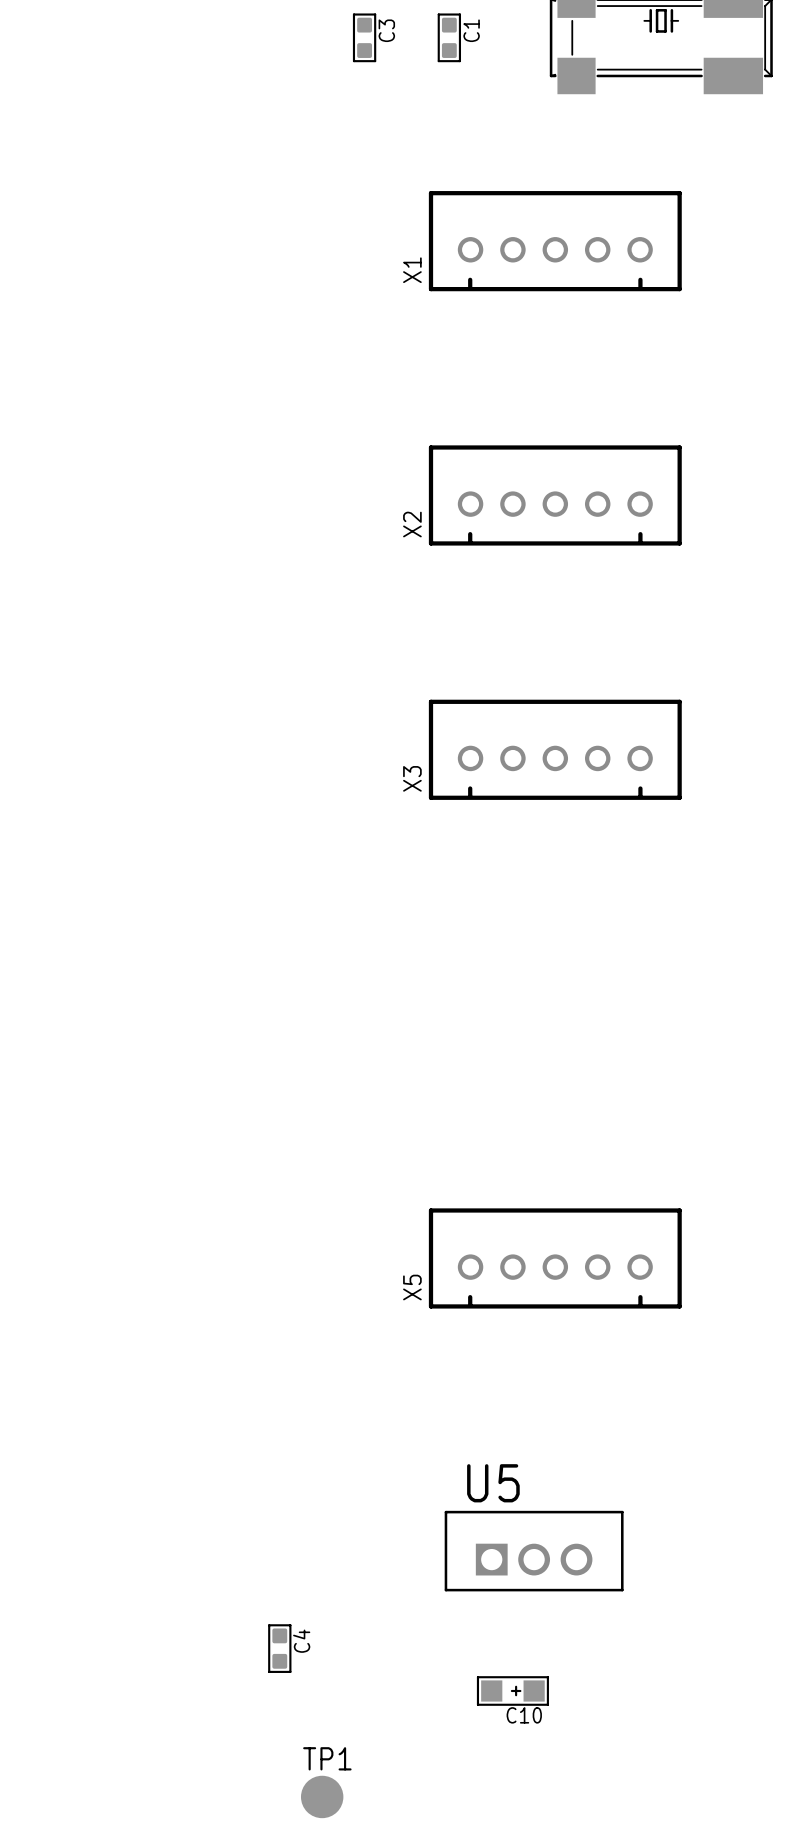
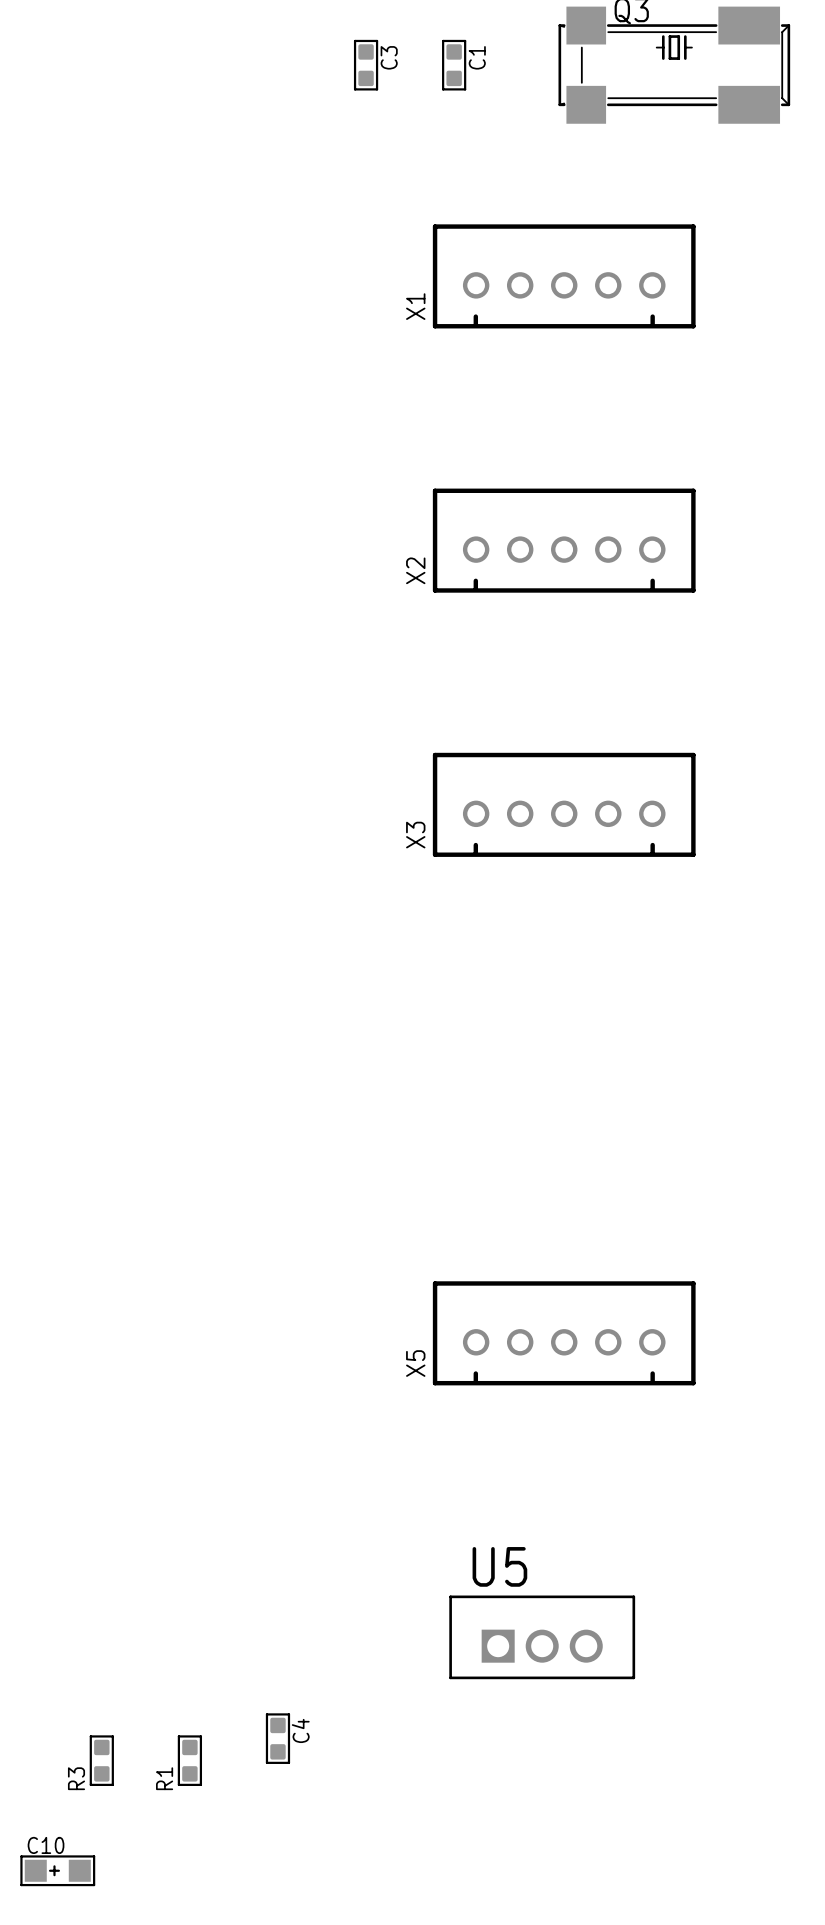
R3: none -> (101, 1760)
R1: none -> (189, 1760)
C10 rotation: 0° (512, 1690) -> 180° (57, 1870)
C10 position: (512, 1690) -> (57, 1870)
TP1: (322, 1796) -> none

